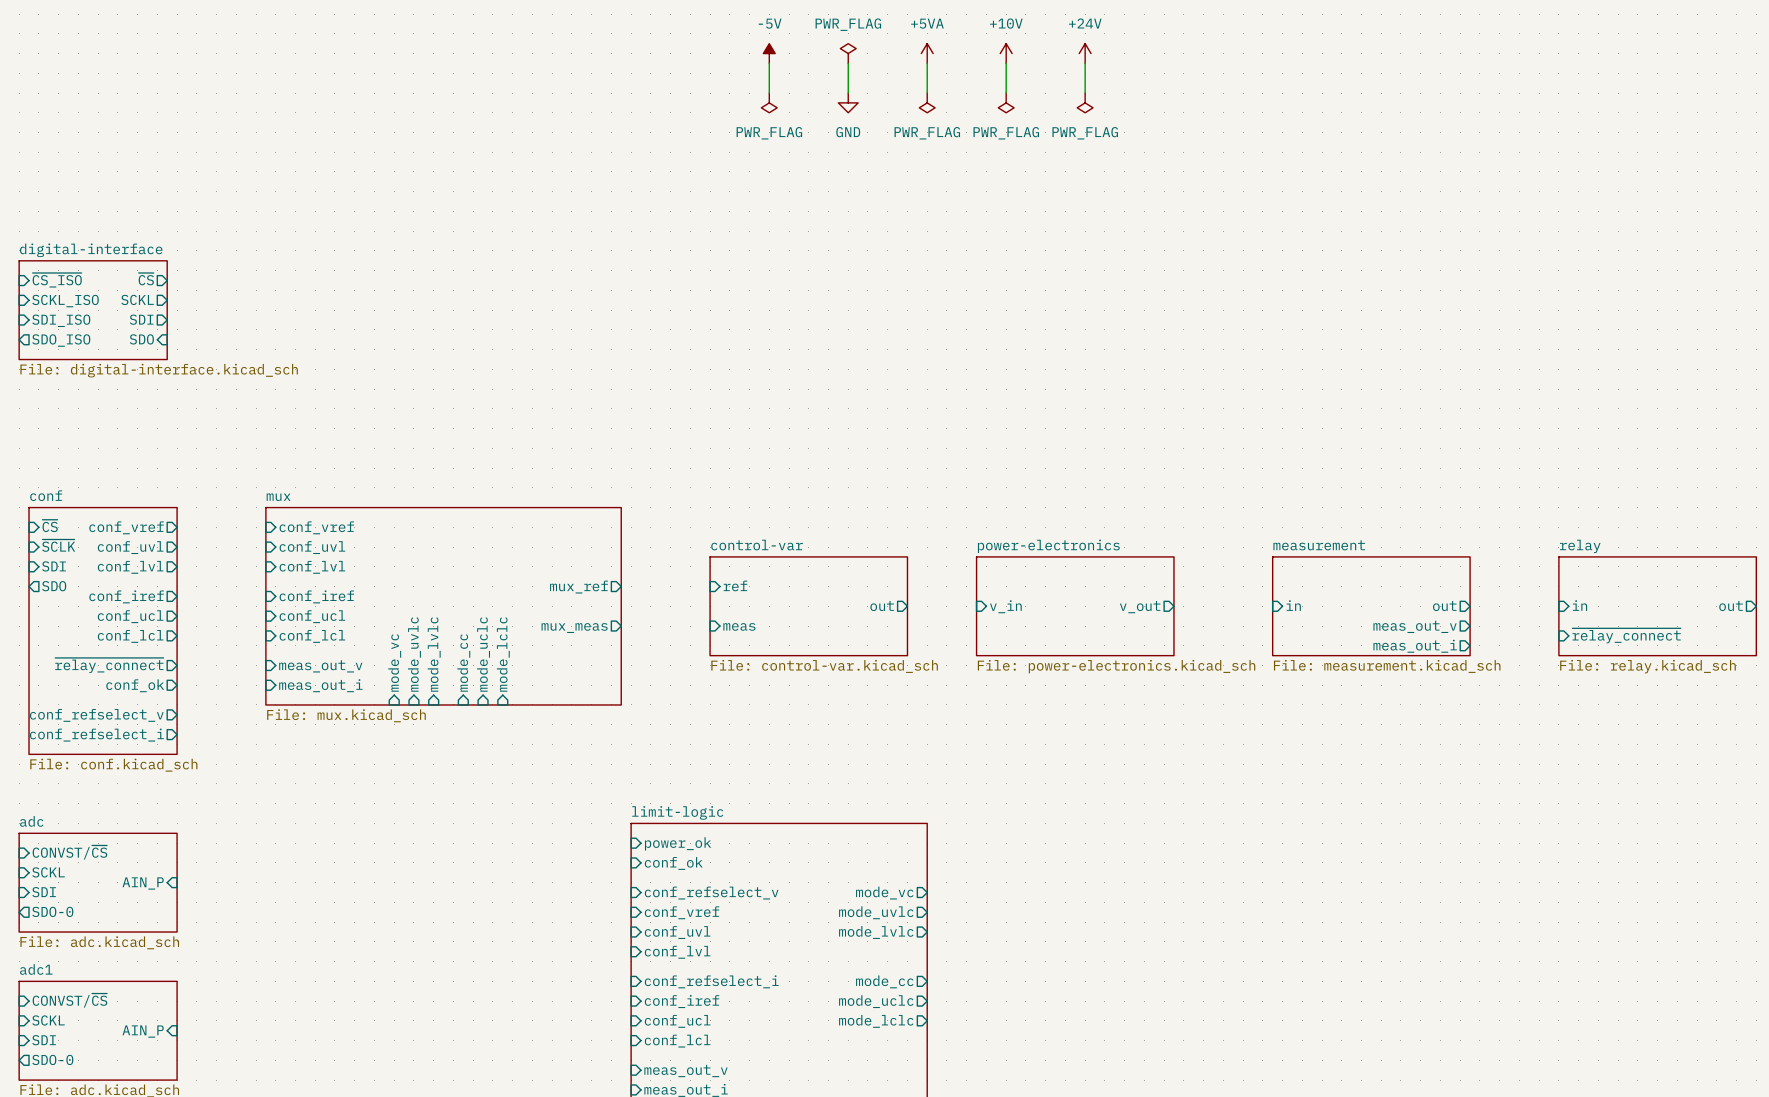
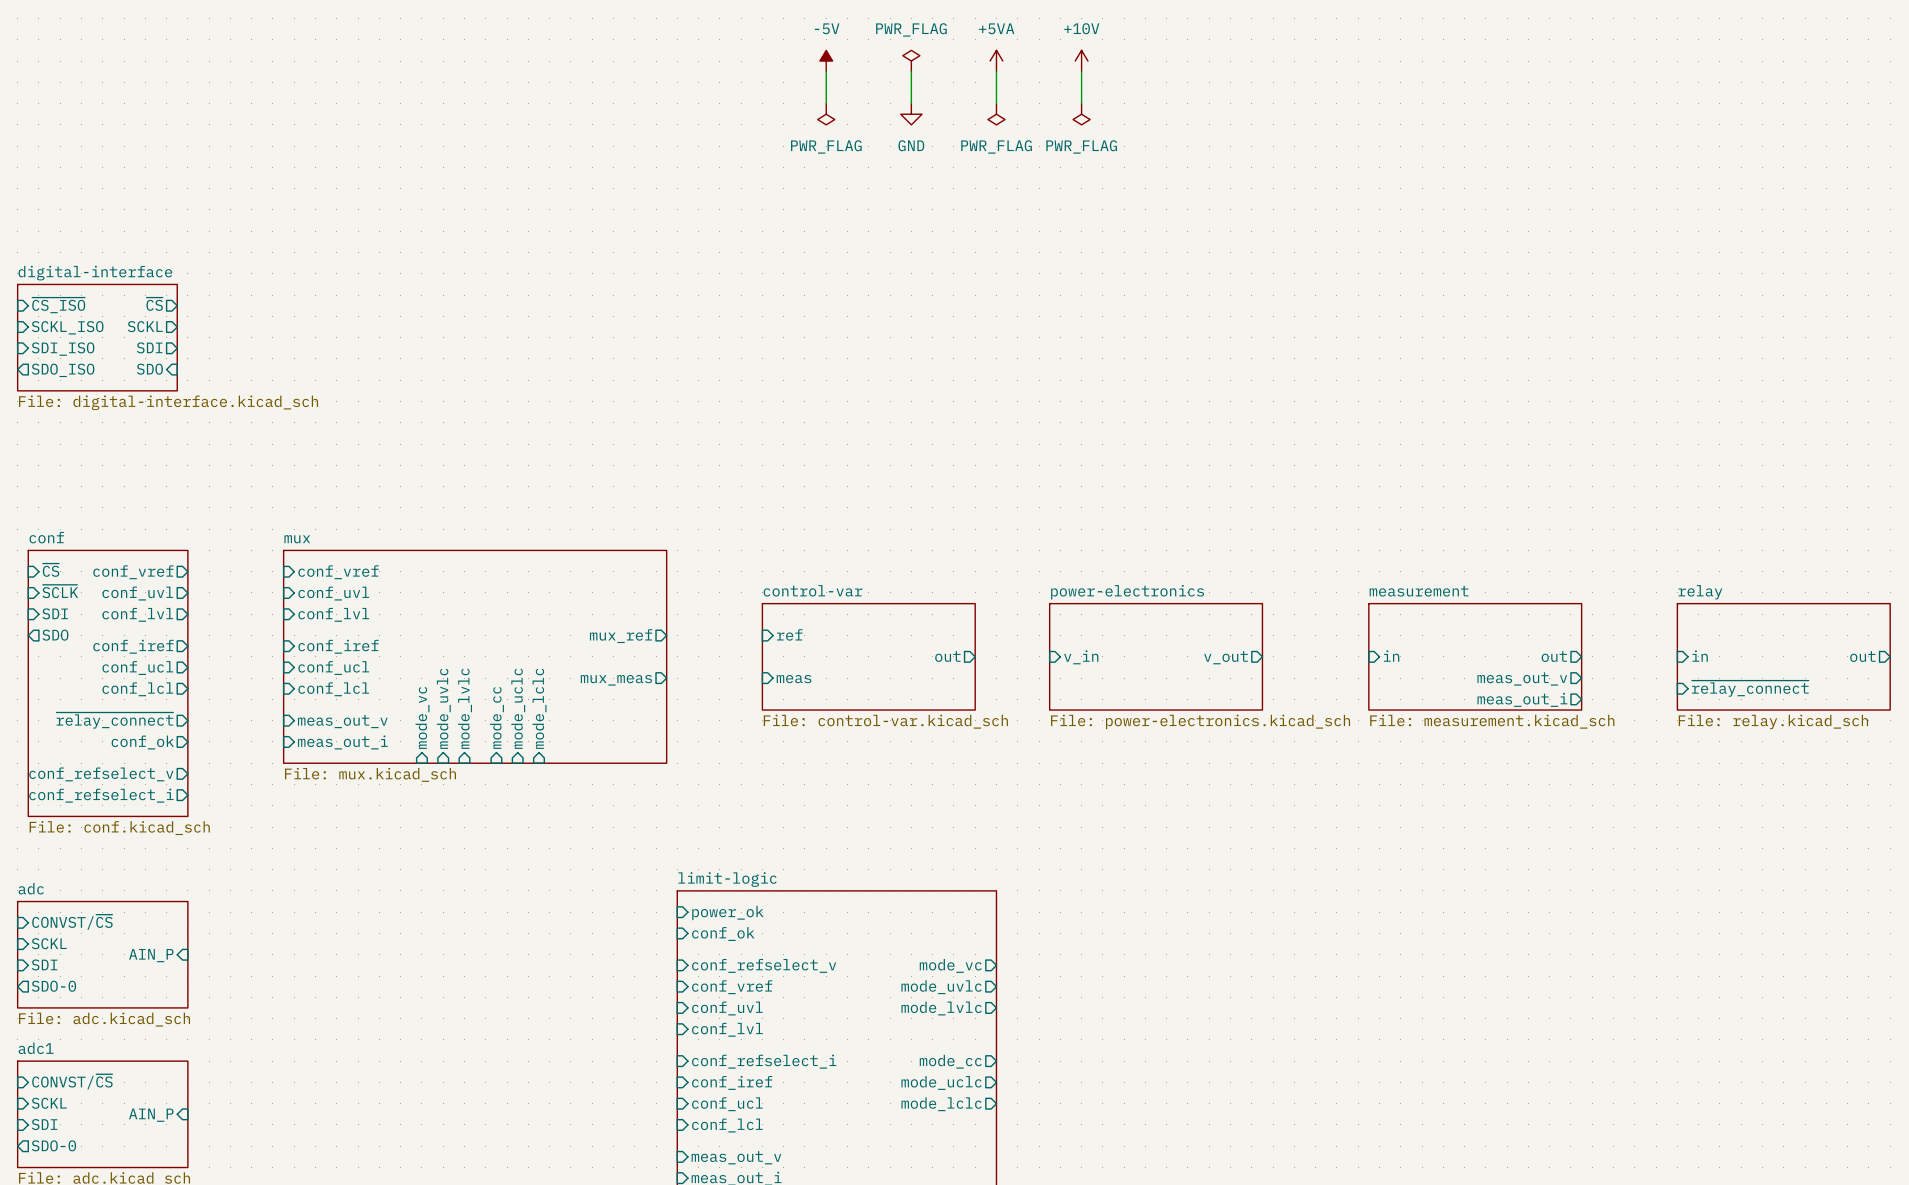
power symbol: +24V (1085, 53) -> none
wire: (1085, 63) (1085, 93) -> none
power symbol: PWR_FLAG (1085, 102) -> none

